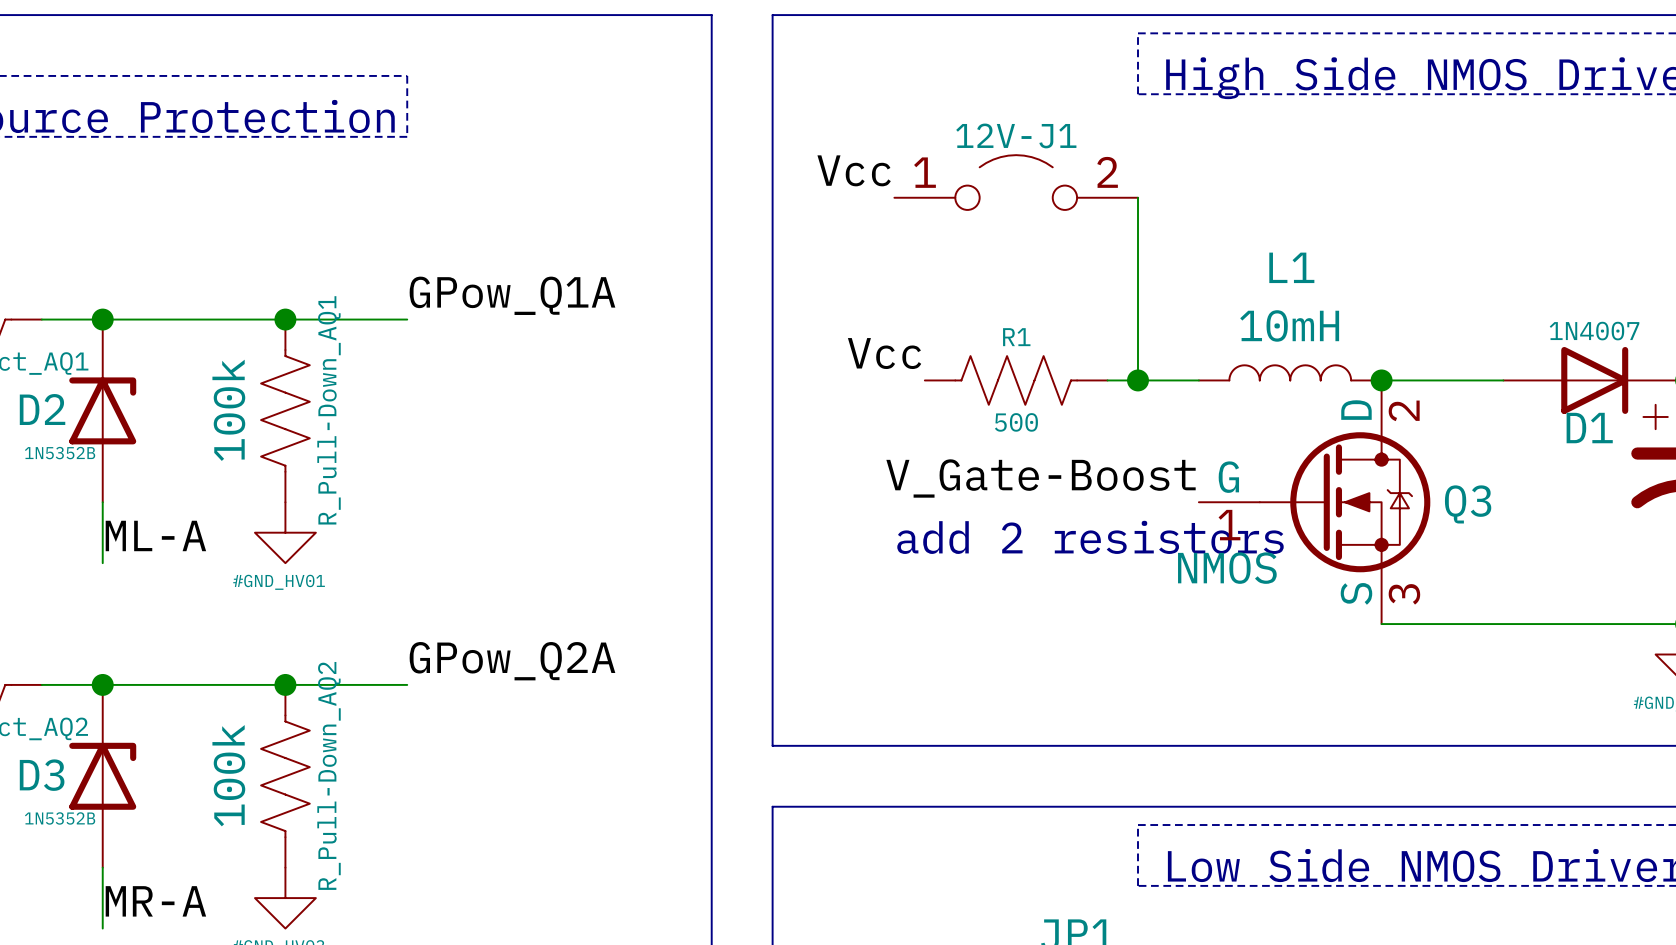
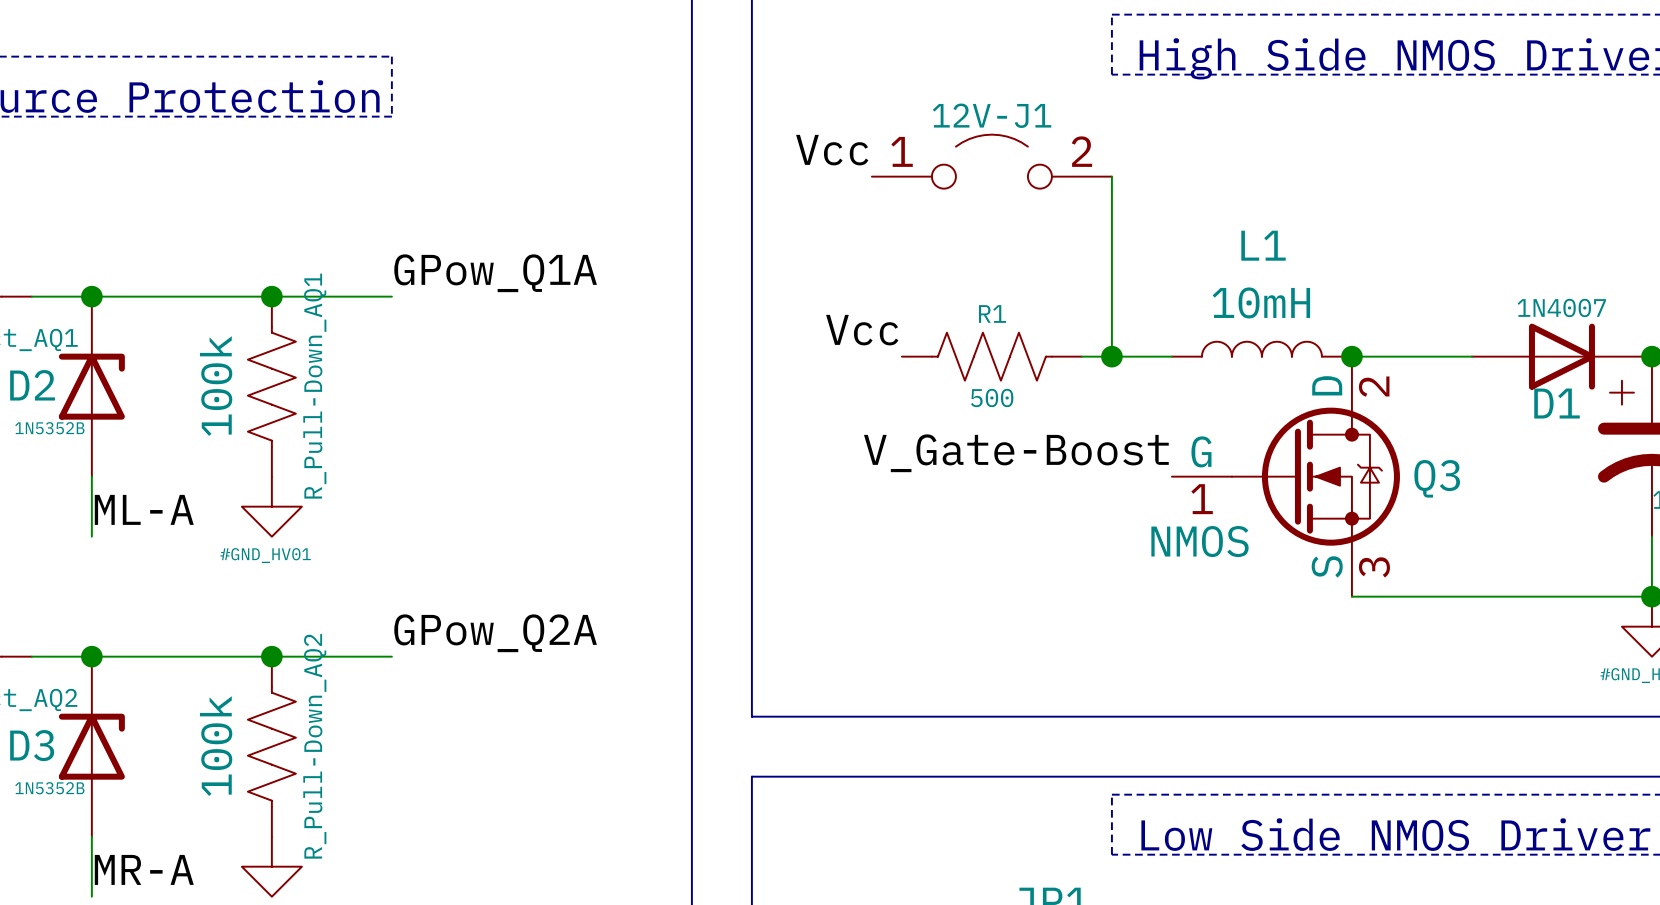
text: add 2 resistors (1090, 537) -> none

